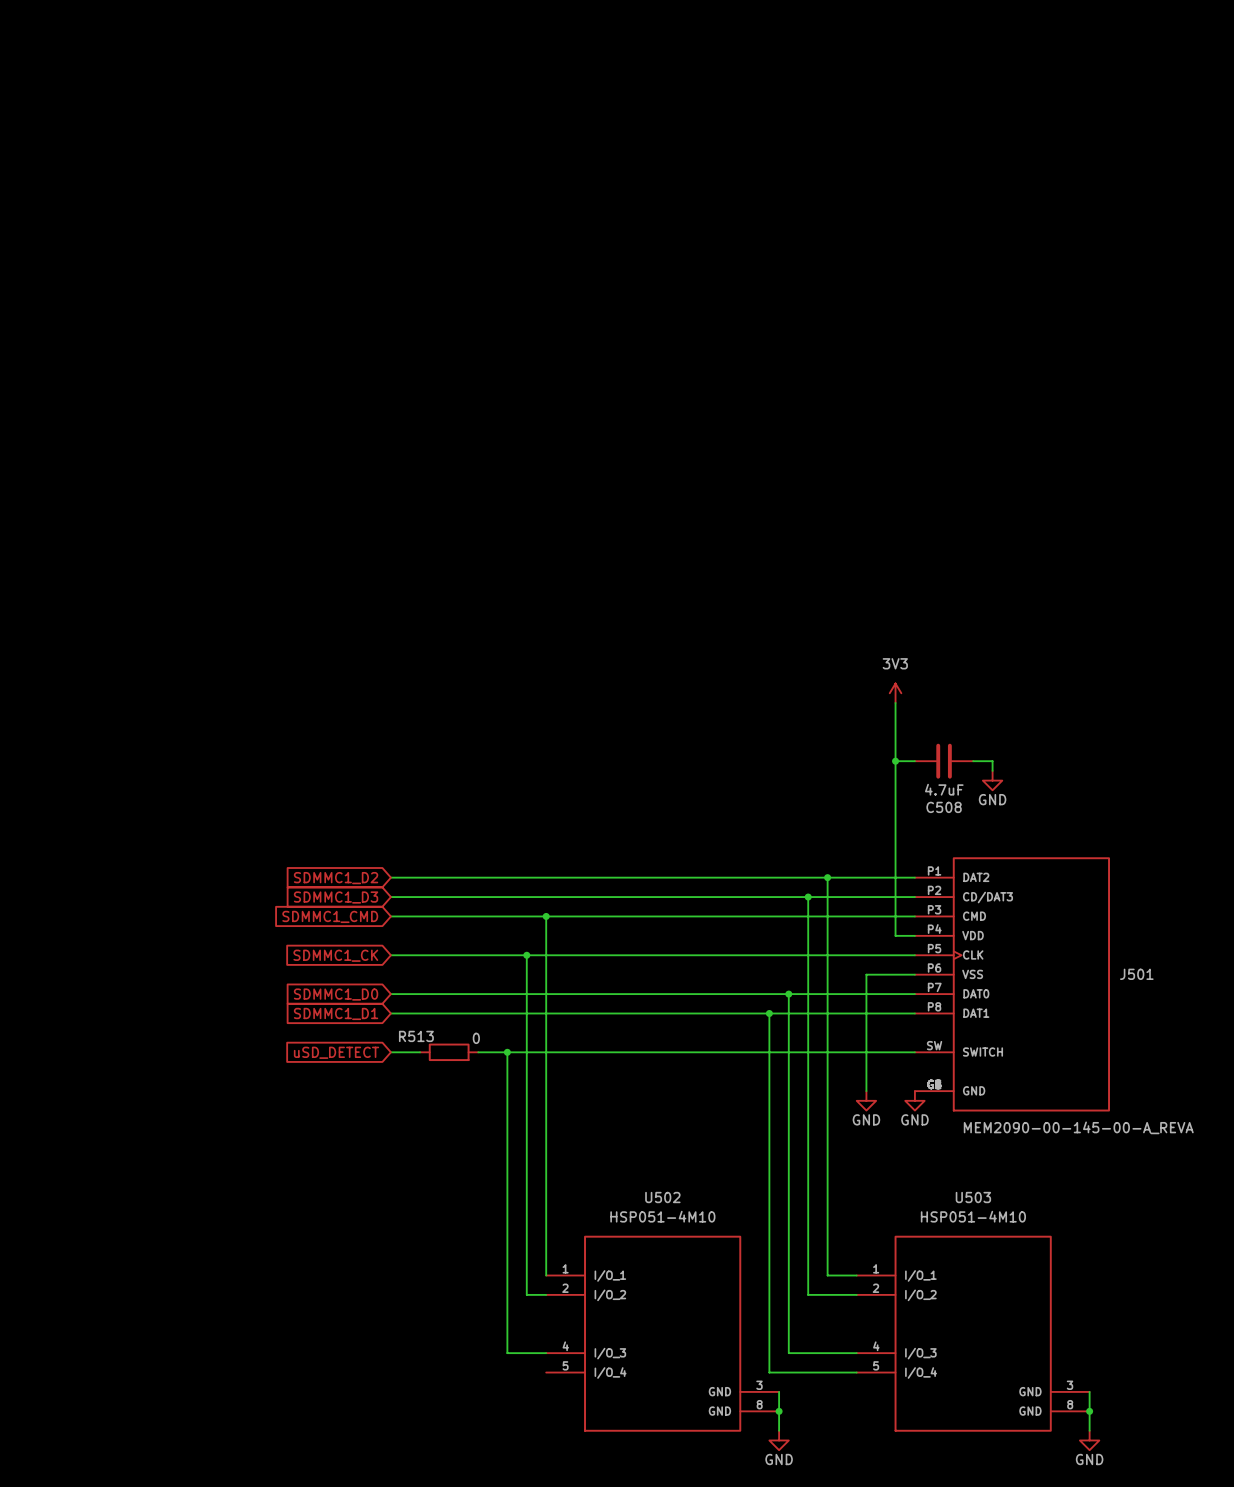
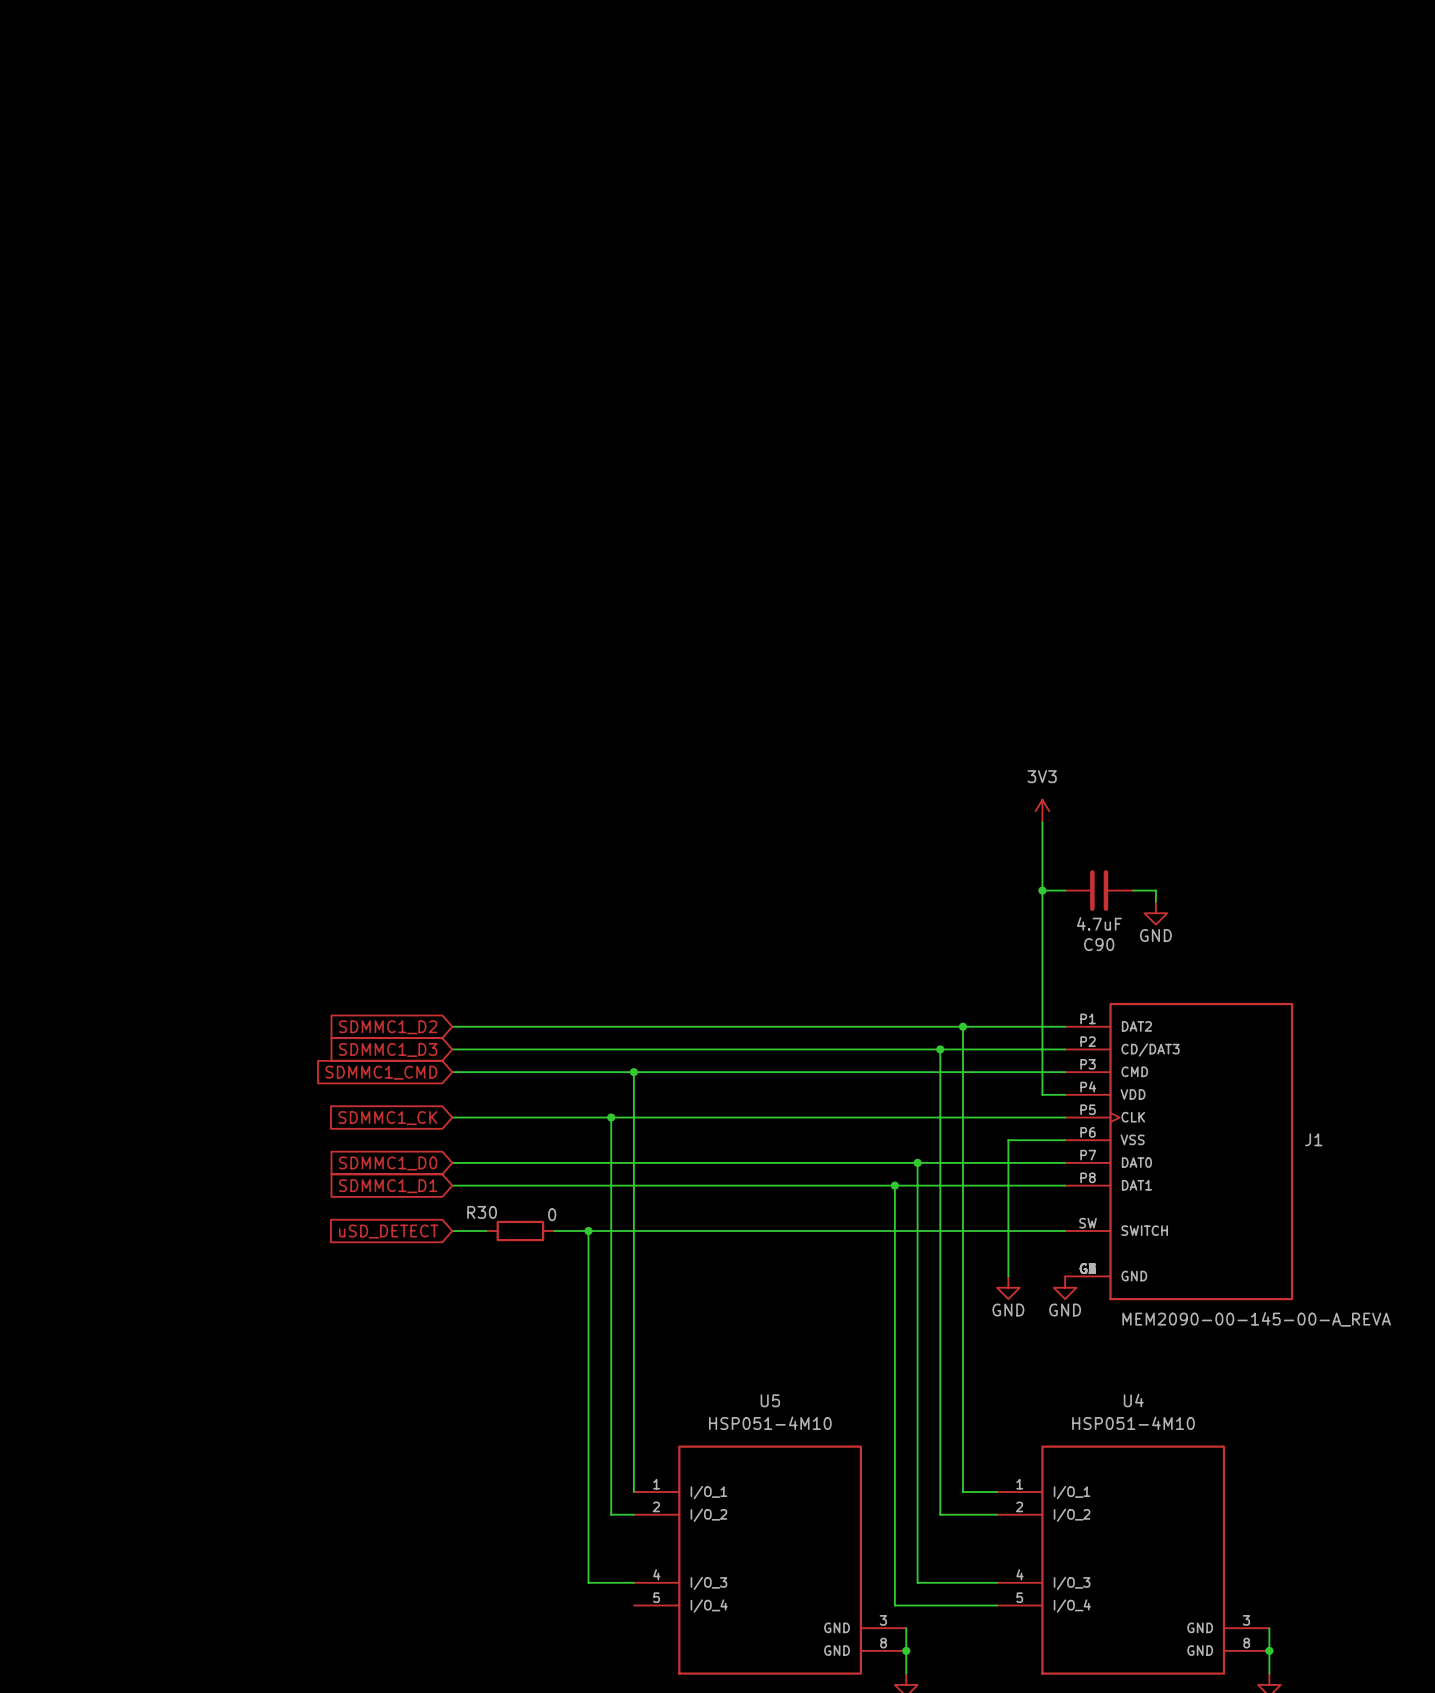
C508 name: C508 (944, 807) -> C90 (1099, 944)
J501 name: J501 (1136, 974) -> J1 (1313, 1139)
R513 name: R513 (416, 1036) -> R30 (482, 1212)
U502 name: U502 (662, 1197) -> U5 (770, 1400)
U503 name: U503 (973, 1197) -> U4 (1133, 1400)

